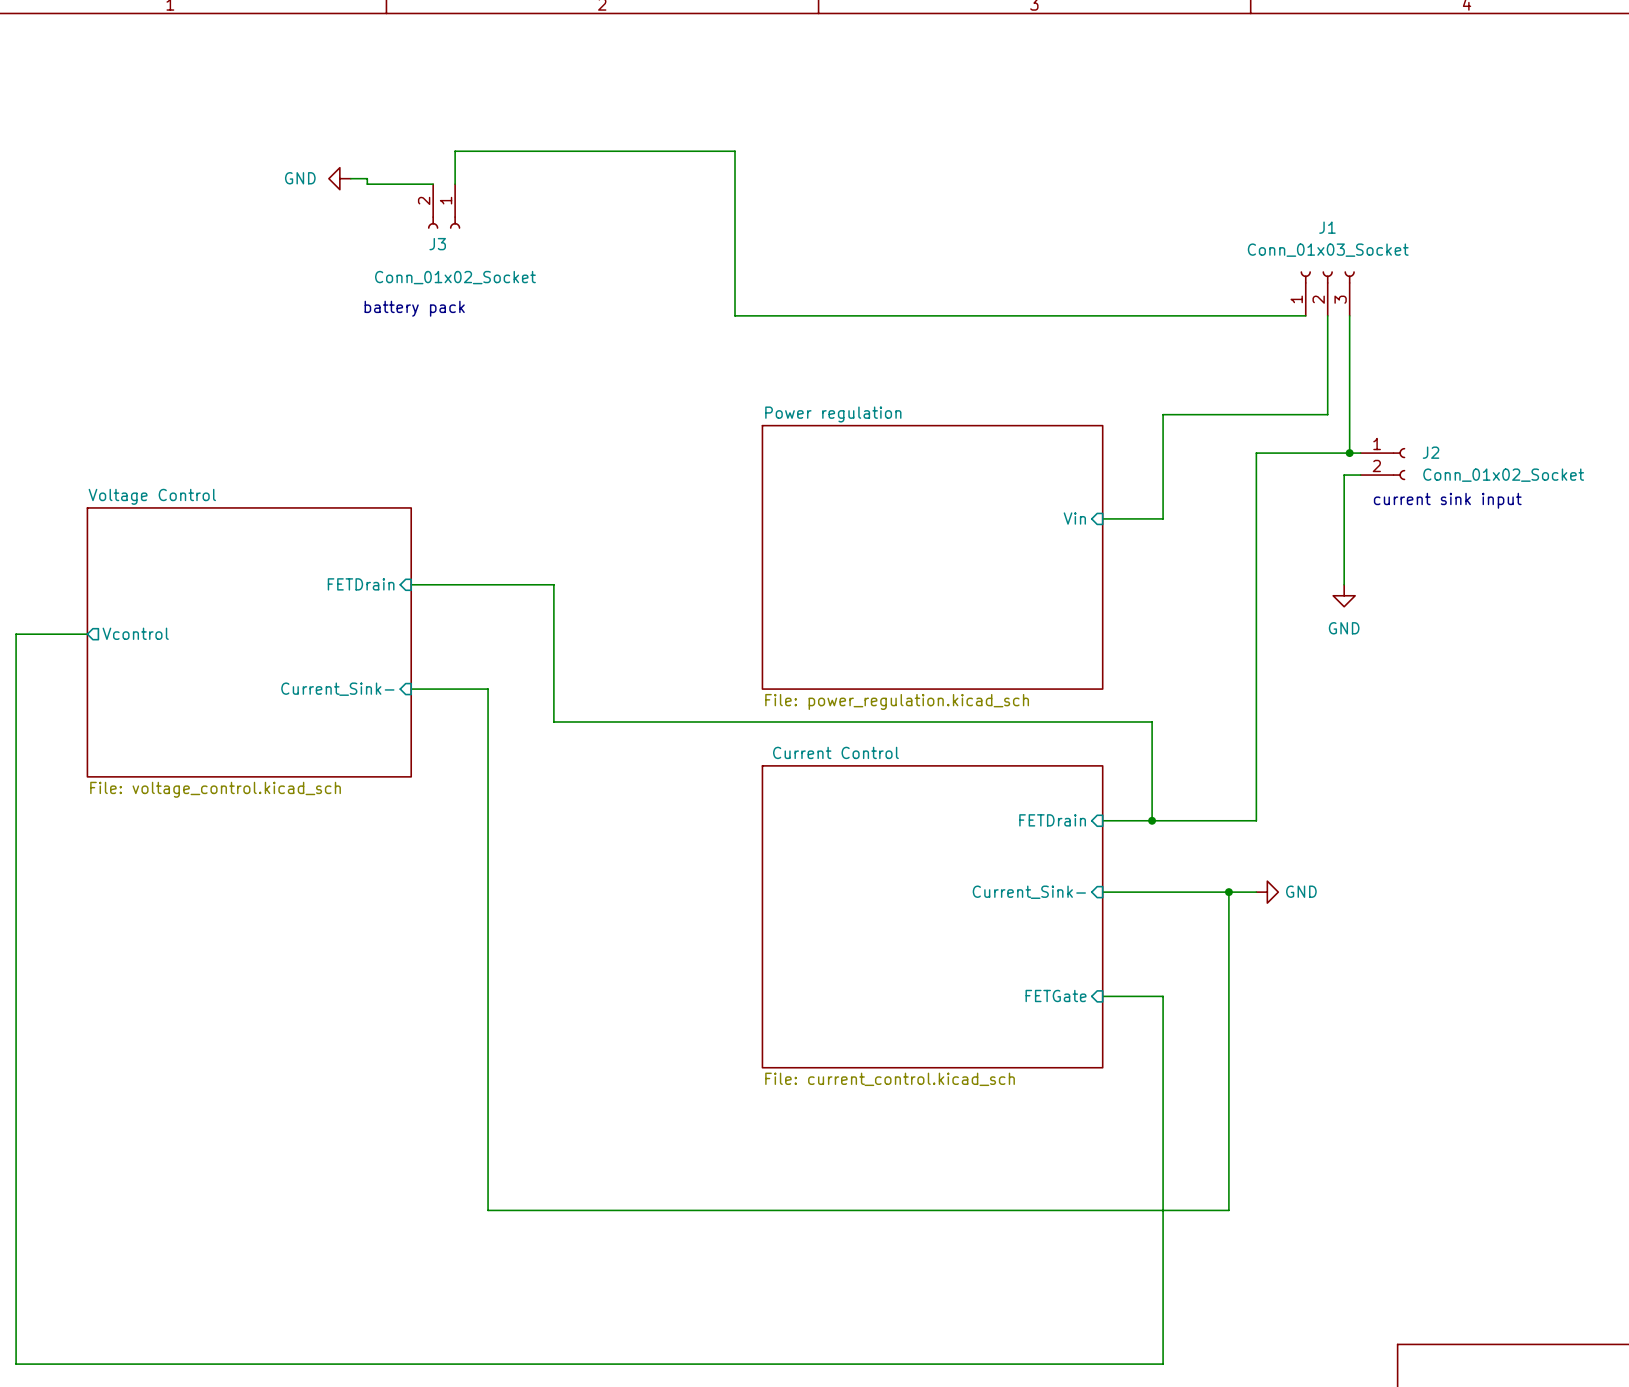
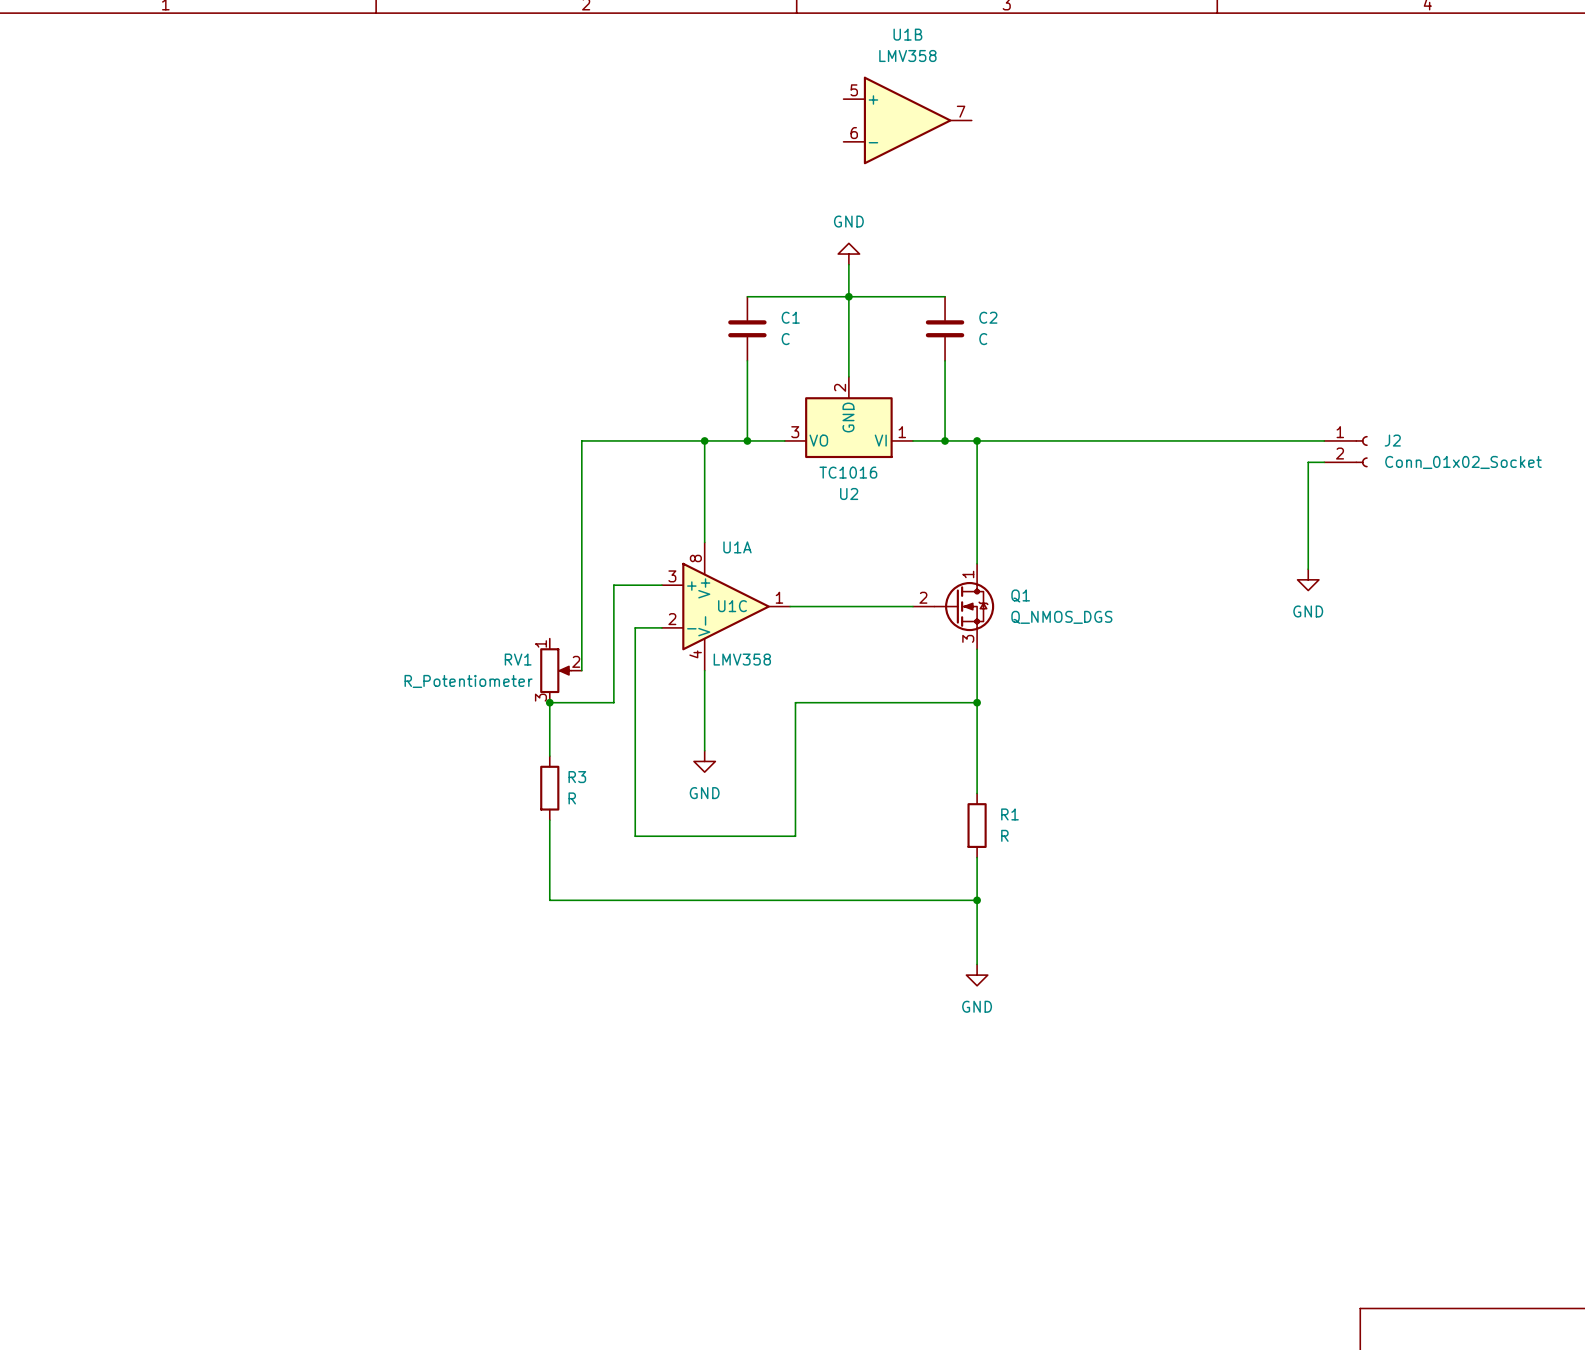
U1B: none -> LMV358 (907, 120)
power symbol: GND (339, 178) -> none
wire: (350, 178) (367, 178) (367, 184) (433, 184) -> none
wire: (455, 184) (455, 151) (735, 151) (735, 315) (1305, 315) -> none
J3: Conn_01x02_Socket (444, 206) -> none
power symbol: none -> GND (848, 254)
wire: none -> (848, 264) (848, 376)
J1: Conn_01x03_Socket (1327, 293) -> none
wire: none -> (747, 296) (945, 296)
junction: none -> (848, 296)
text: battery pack (414, 308) -> none
wire: (1327, 315) (1327, 414) (1163, 414) (1163, 518) (1102, 518) -> none
wire: (1349, 315) (1349, 453) -> none
C1: none -> C (747, 328)
C2: none -> C (945, 328)
wire: none -> (747, 360) (747, 440)
wire: none -> (945, 360) (945, 440)
U2: none -> TC1016 (848, 417)
wire: none -> (704, 440) (704, 542)
junction: none -> (704, 440)
junction: none -> (747, 440)
wire: none -> (784, 440) (581, 440) (581, 670)
junction: none -> (945, 440)
wire: none -> (977, 440) (977, 563)
junction: none -> (977, 440)
wire: (1256, 453) (1256, 820) (1102, 820) -> (1222, 440) (912, 440)
junction: (1349, 453) -> none
text: current sink input (1447, 500) -> none
sheet pin: Vin (1074, 518) -> none
sheet Power regulation: File: power_regulation.kicad_sch (932, 557) -> none
sheet pin: FETDrain (361, 584) -> none
wire: (411, 584) (553, 584) (553, 721) (564, 721) -> (549, 756) (549, 702)
wire: none -> (661, 585) (613, 585) (613, 702)
U1C: none -> (704, 606)
U1A: none -> LMV358 (726, 606)
wire: none -> (790, 606) (912, 606)
Q1: none -> Q_NMOS_DGS (953, 606)
sheet pin: Vcontrol (135, 633) -> none
wire: (87, 634) (16, 634) (16, 1364) (1163, 1364) (1163, 996) (1102, 996) -> none
sheet Voltage Control: File: voltage_control.kicad_sch (249, 642) -> none
wire: none -> (977, 649) (977, 793)
sheet pin: Current_Sink- (337, 689) -> none
wire: (411, 689) (488, 689) (488, 1210) (1228, 1210) (1228, 892) -> none
RV1: none -> R_Potentiometer (560, 670)
wire: none -> (704, 670) (704, 750)
junction: none -> (549, 702)
wire: (630, 721) (817, 721) -> (661, 627) (635, 627) (635, 836) (795, 836) (795, 702)
wire: (1003, 721) (1152, 721) (1152, 820) -> none
junction: none -> (977, 702)
power symbol: none -> GND (704, 761)
R3: none -> R (549, 788)
sheet pin: FETDrain (1052, 820) -> none
junction: (1152, 820) -> none
wire: none -> (549, 820) (549, 900) (977, 900)
R1: none -> R (977, 825)
wire: none -> (977, 857) (977, 964)
sheet pin: Current_Sink- (1029, 892) -> none
wire: (1102, 892) (1256, 892) -> none
junction: (1228, 892) -> none
power symbol: GND (1267, 892) -> none
sheet Current Control: File: current_control.kicad_sch (932, 916) -> none
junction: none -> (977, 900)
sheet pin: FETGate (1056, 995) -> none
power symbol: none -> GND (977, 975)

